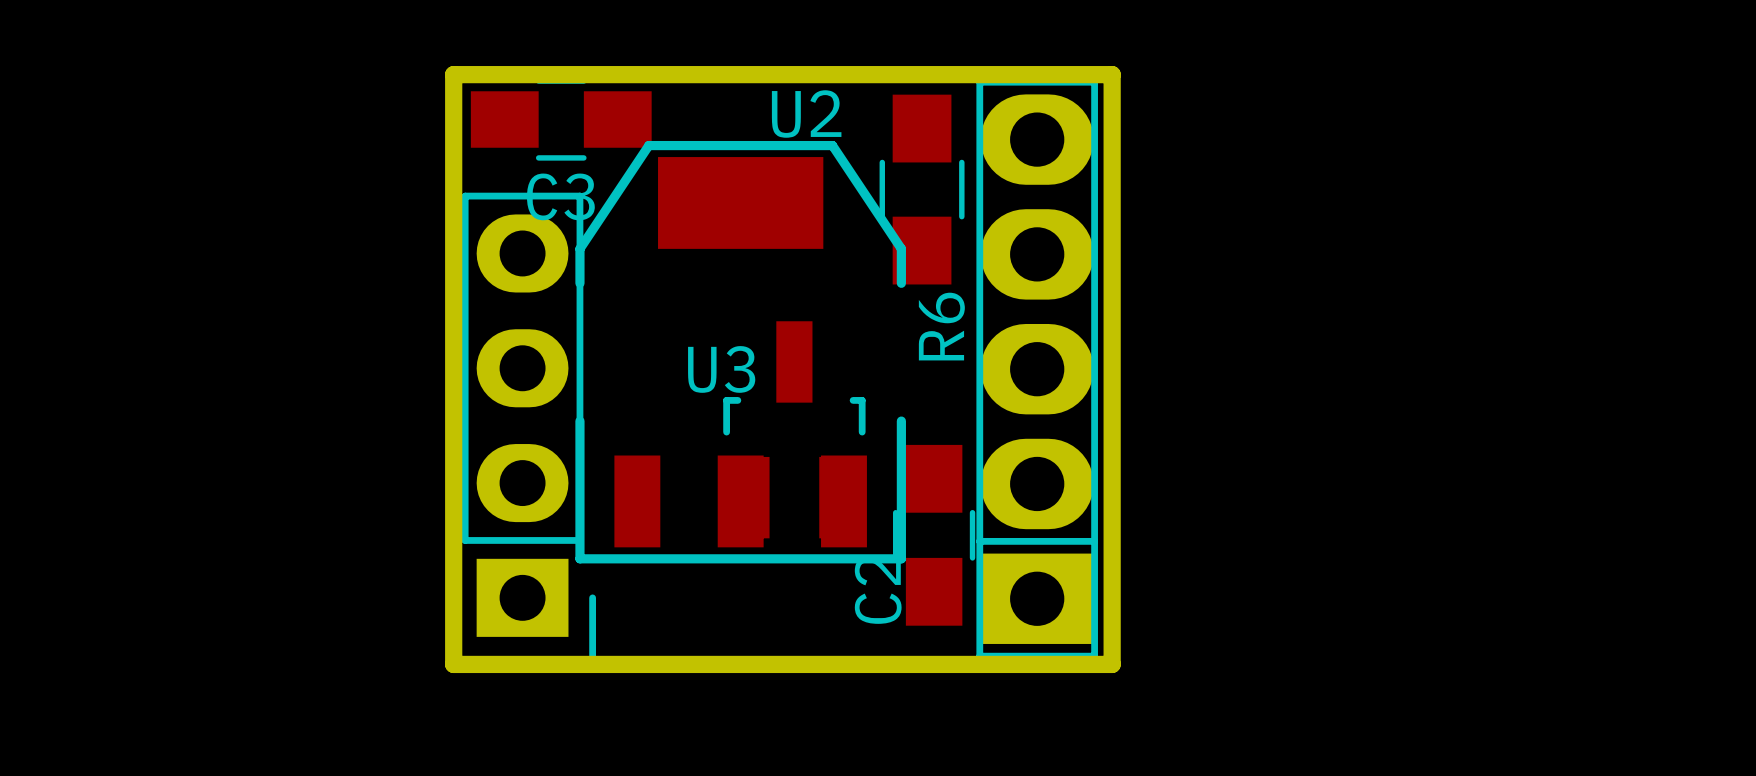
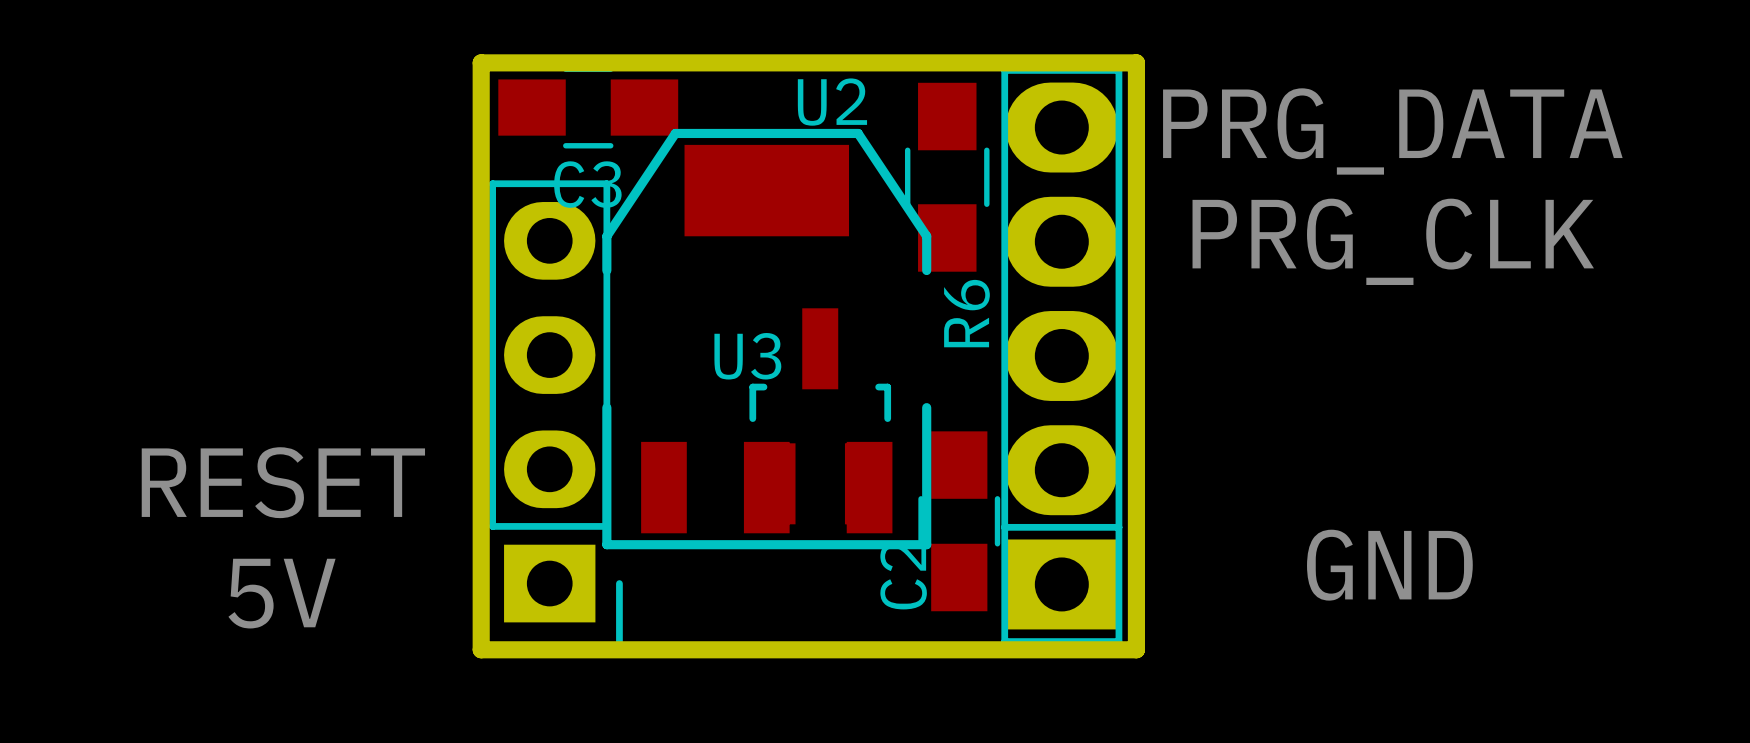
text: none -> PRG_DATA (1392, 131)
text: none -> PRG_CLK (1393, 241)
text: none -> RESET (283, 482)
text: none -> GND (1389, 565)
text: none -> 5V (282, 593)

